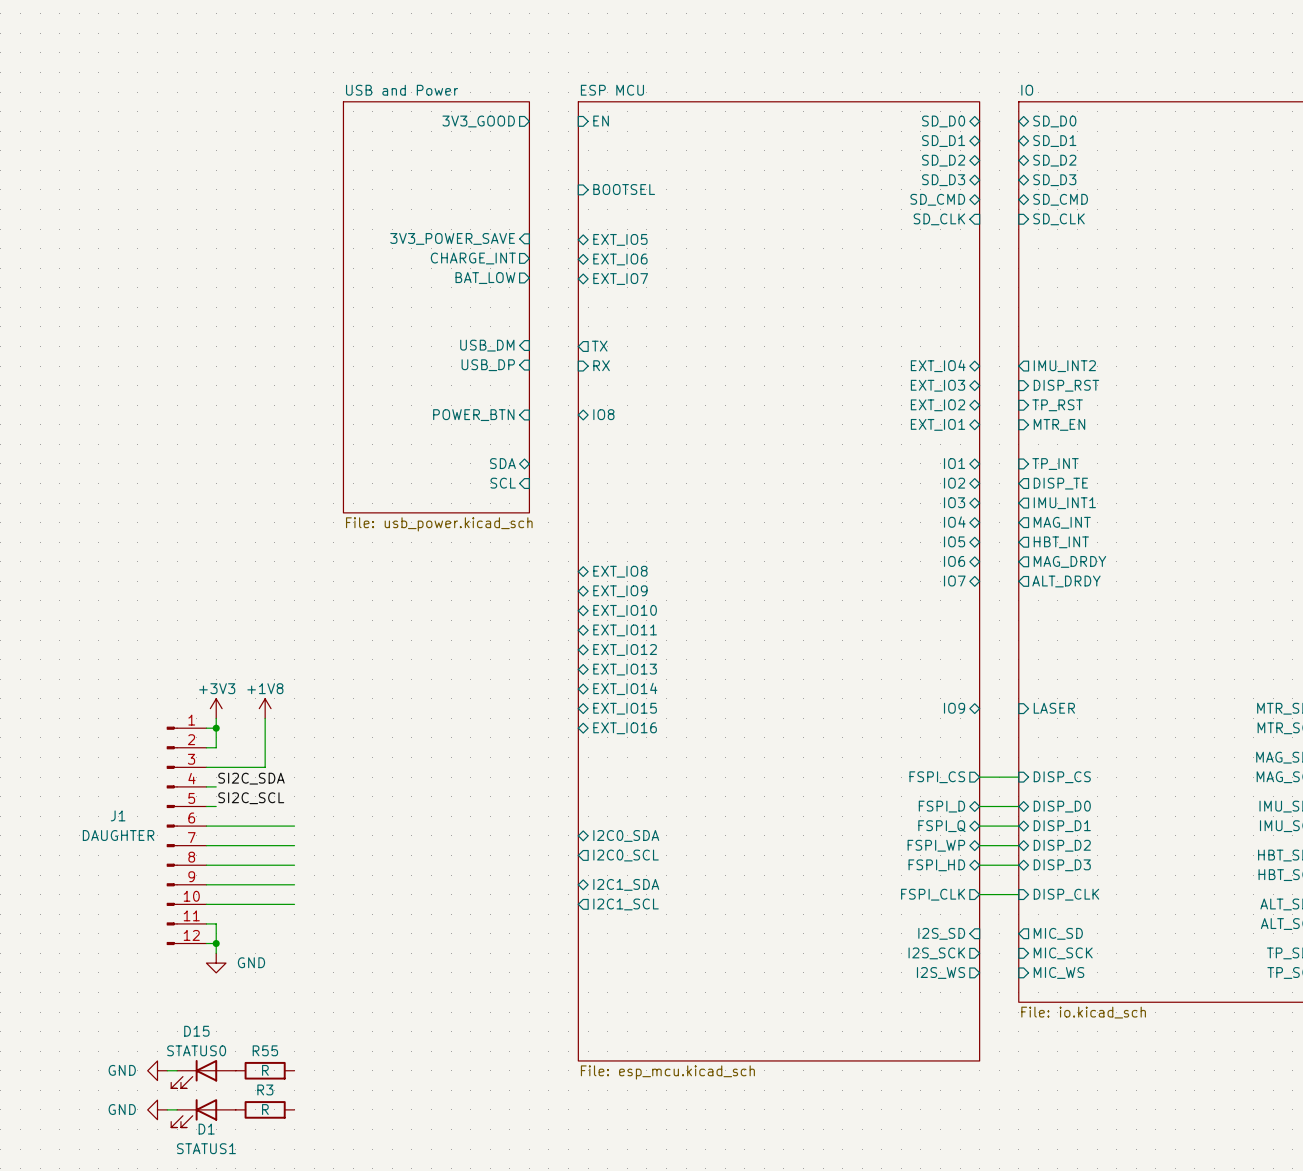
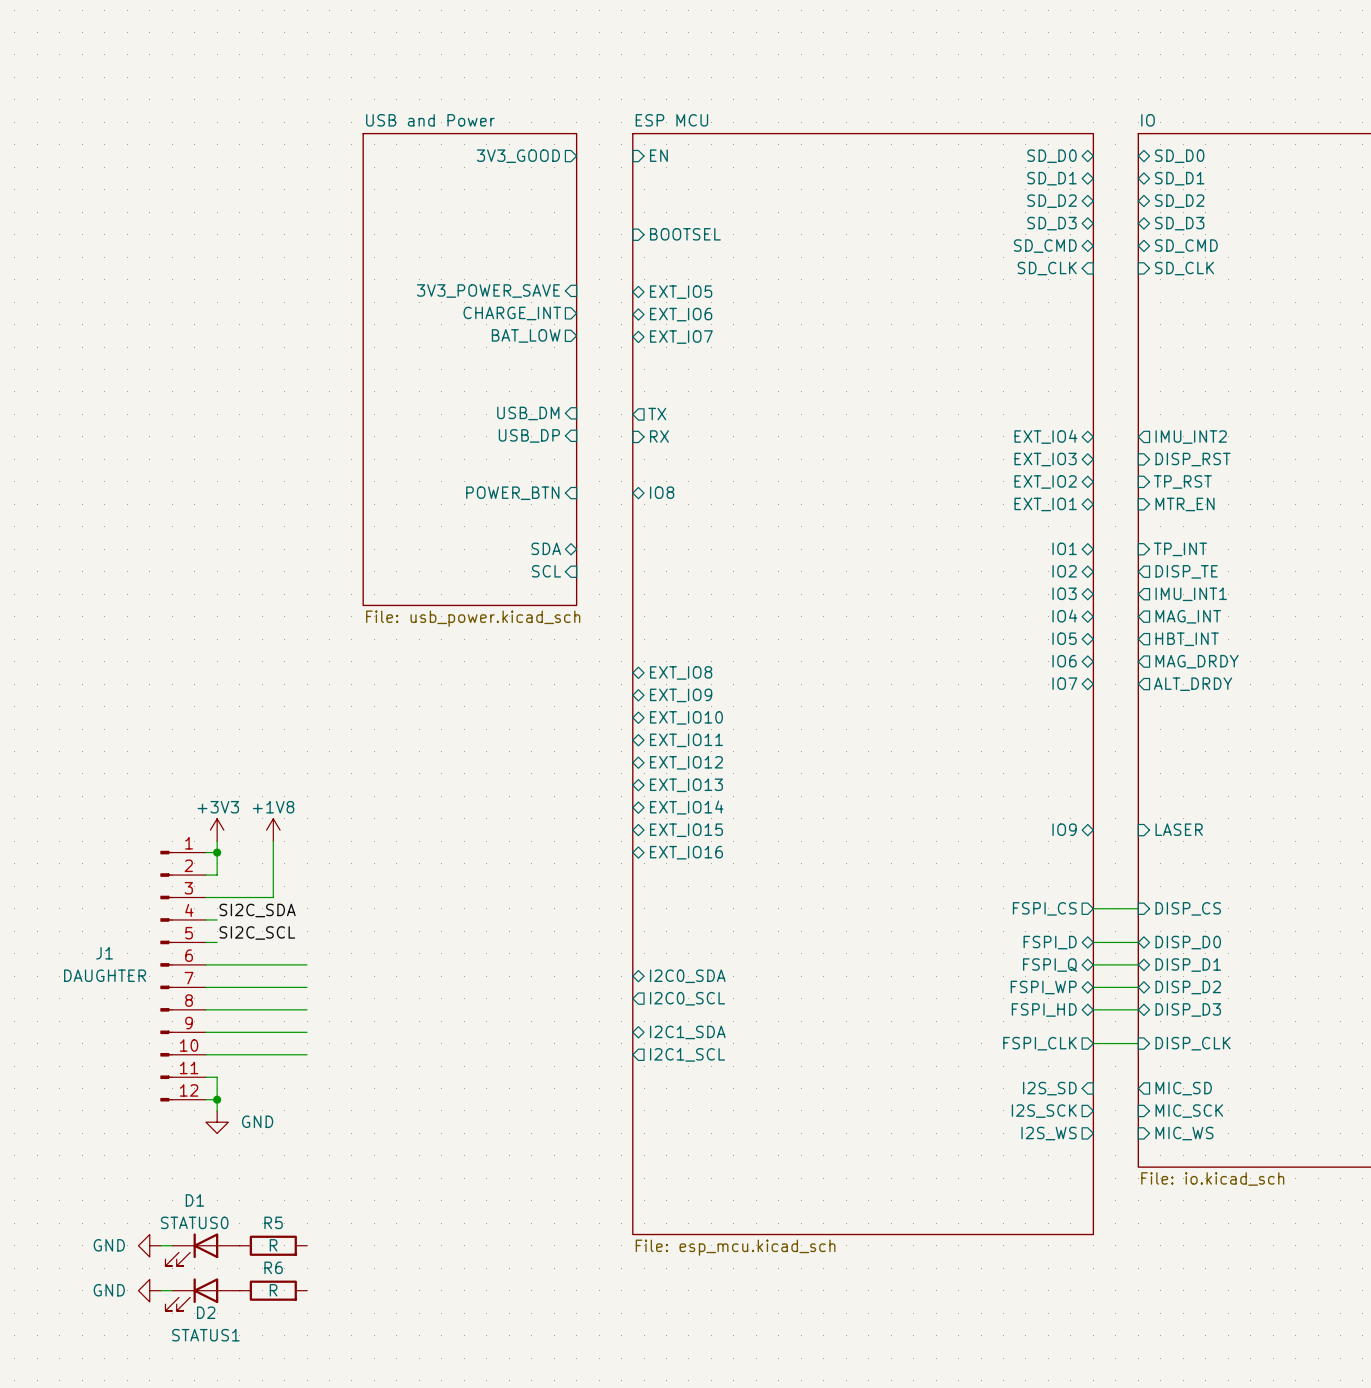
D15 name: D15 (196, 1031) -> D1 (194, 1200)
R55 name: R55 (265, 1050) -> R5 (273, 1222)
R3 name: R3 (265, 1089) -> R6 (273, 1267)
D1 name: D1 (206, 1129) -> D2 (206, 1312)

